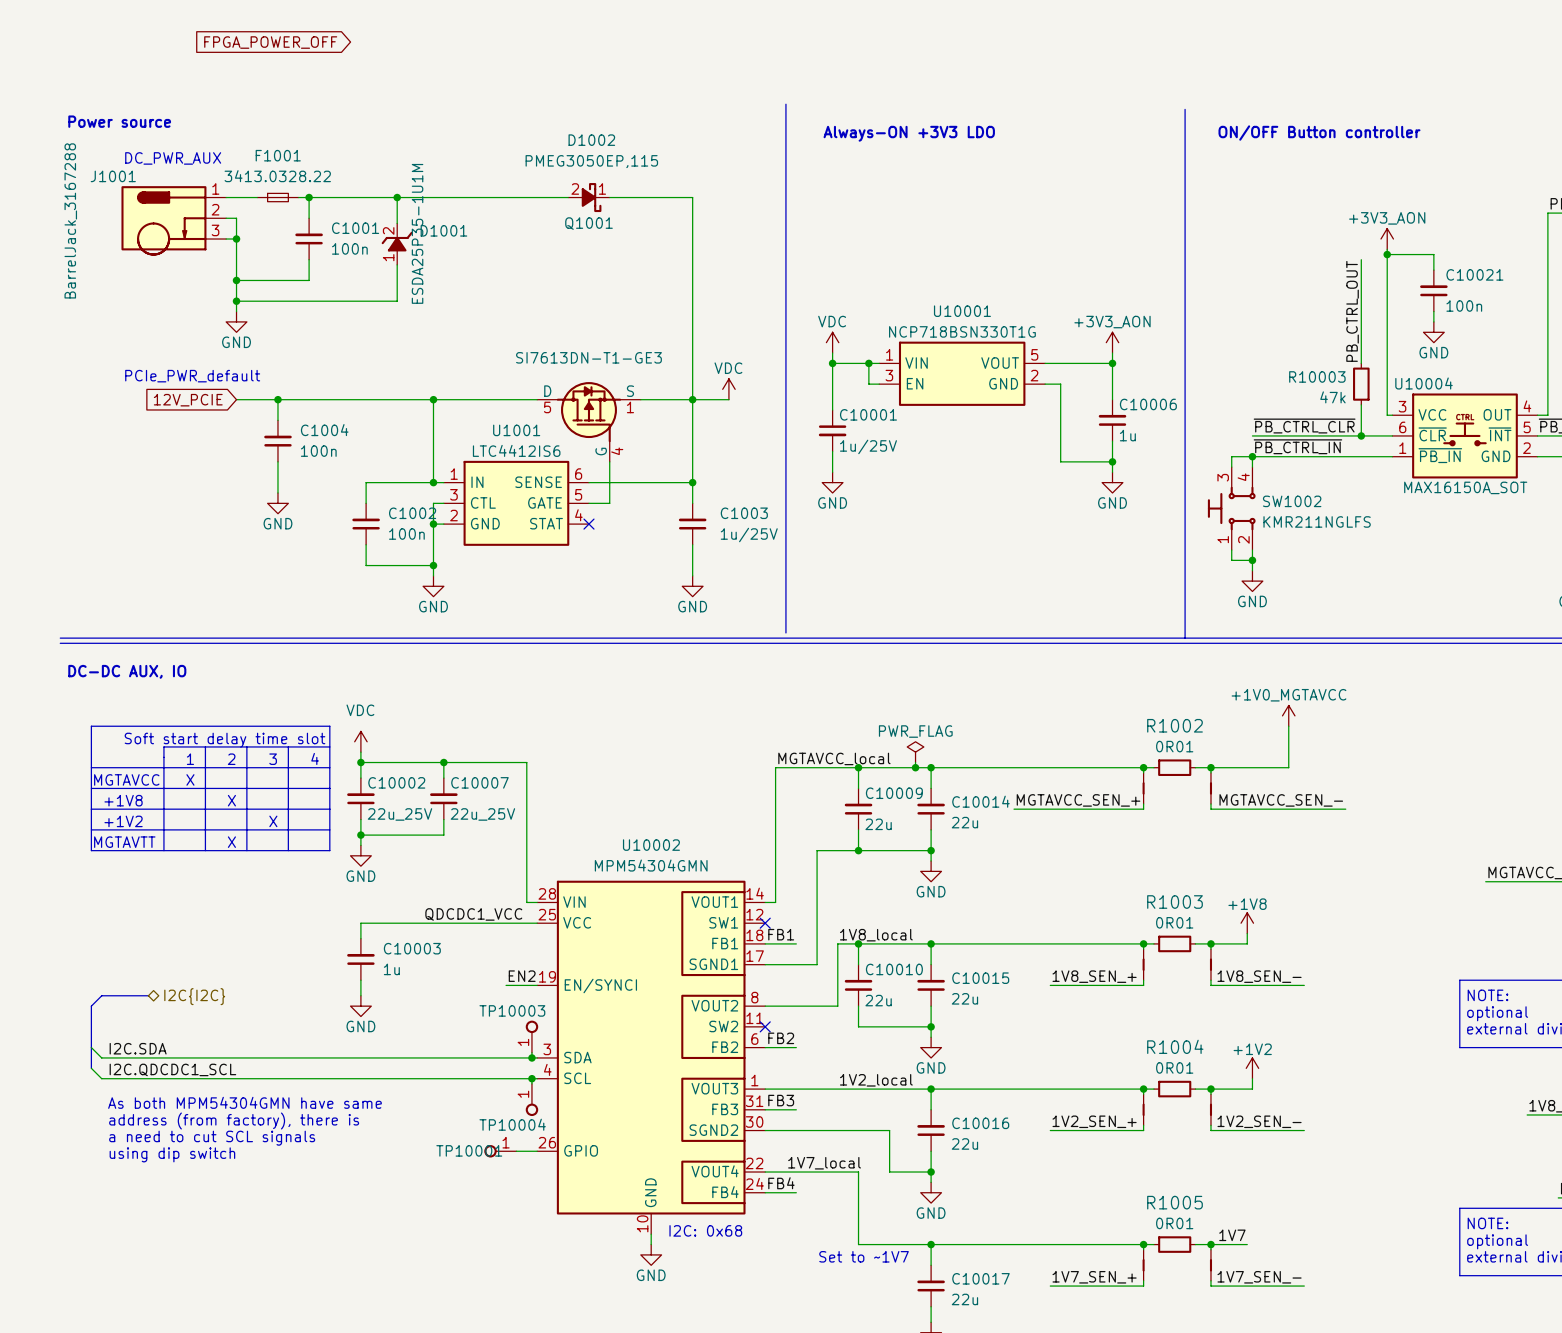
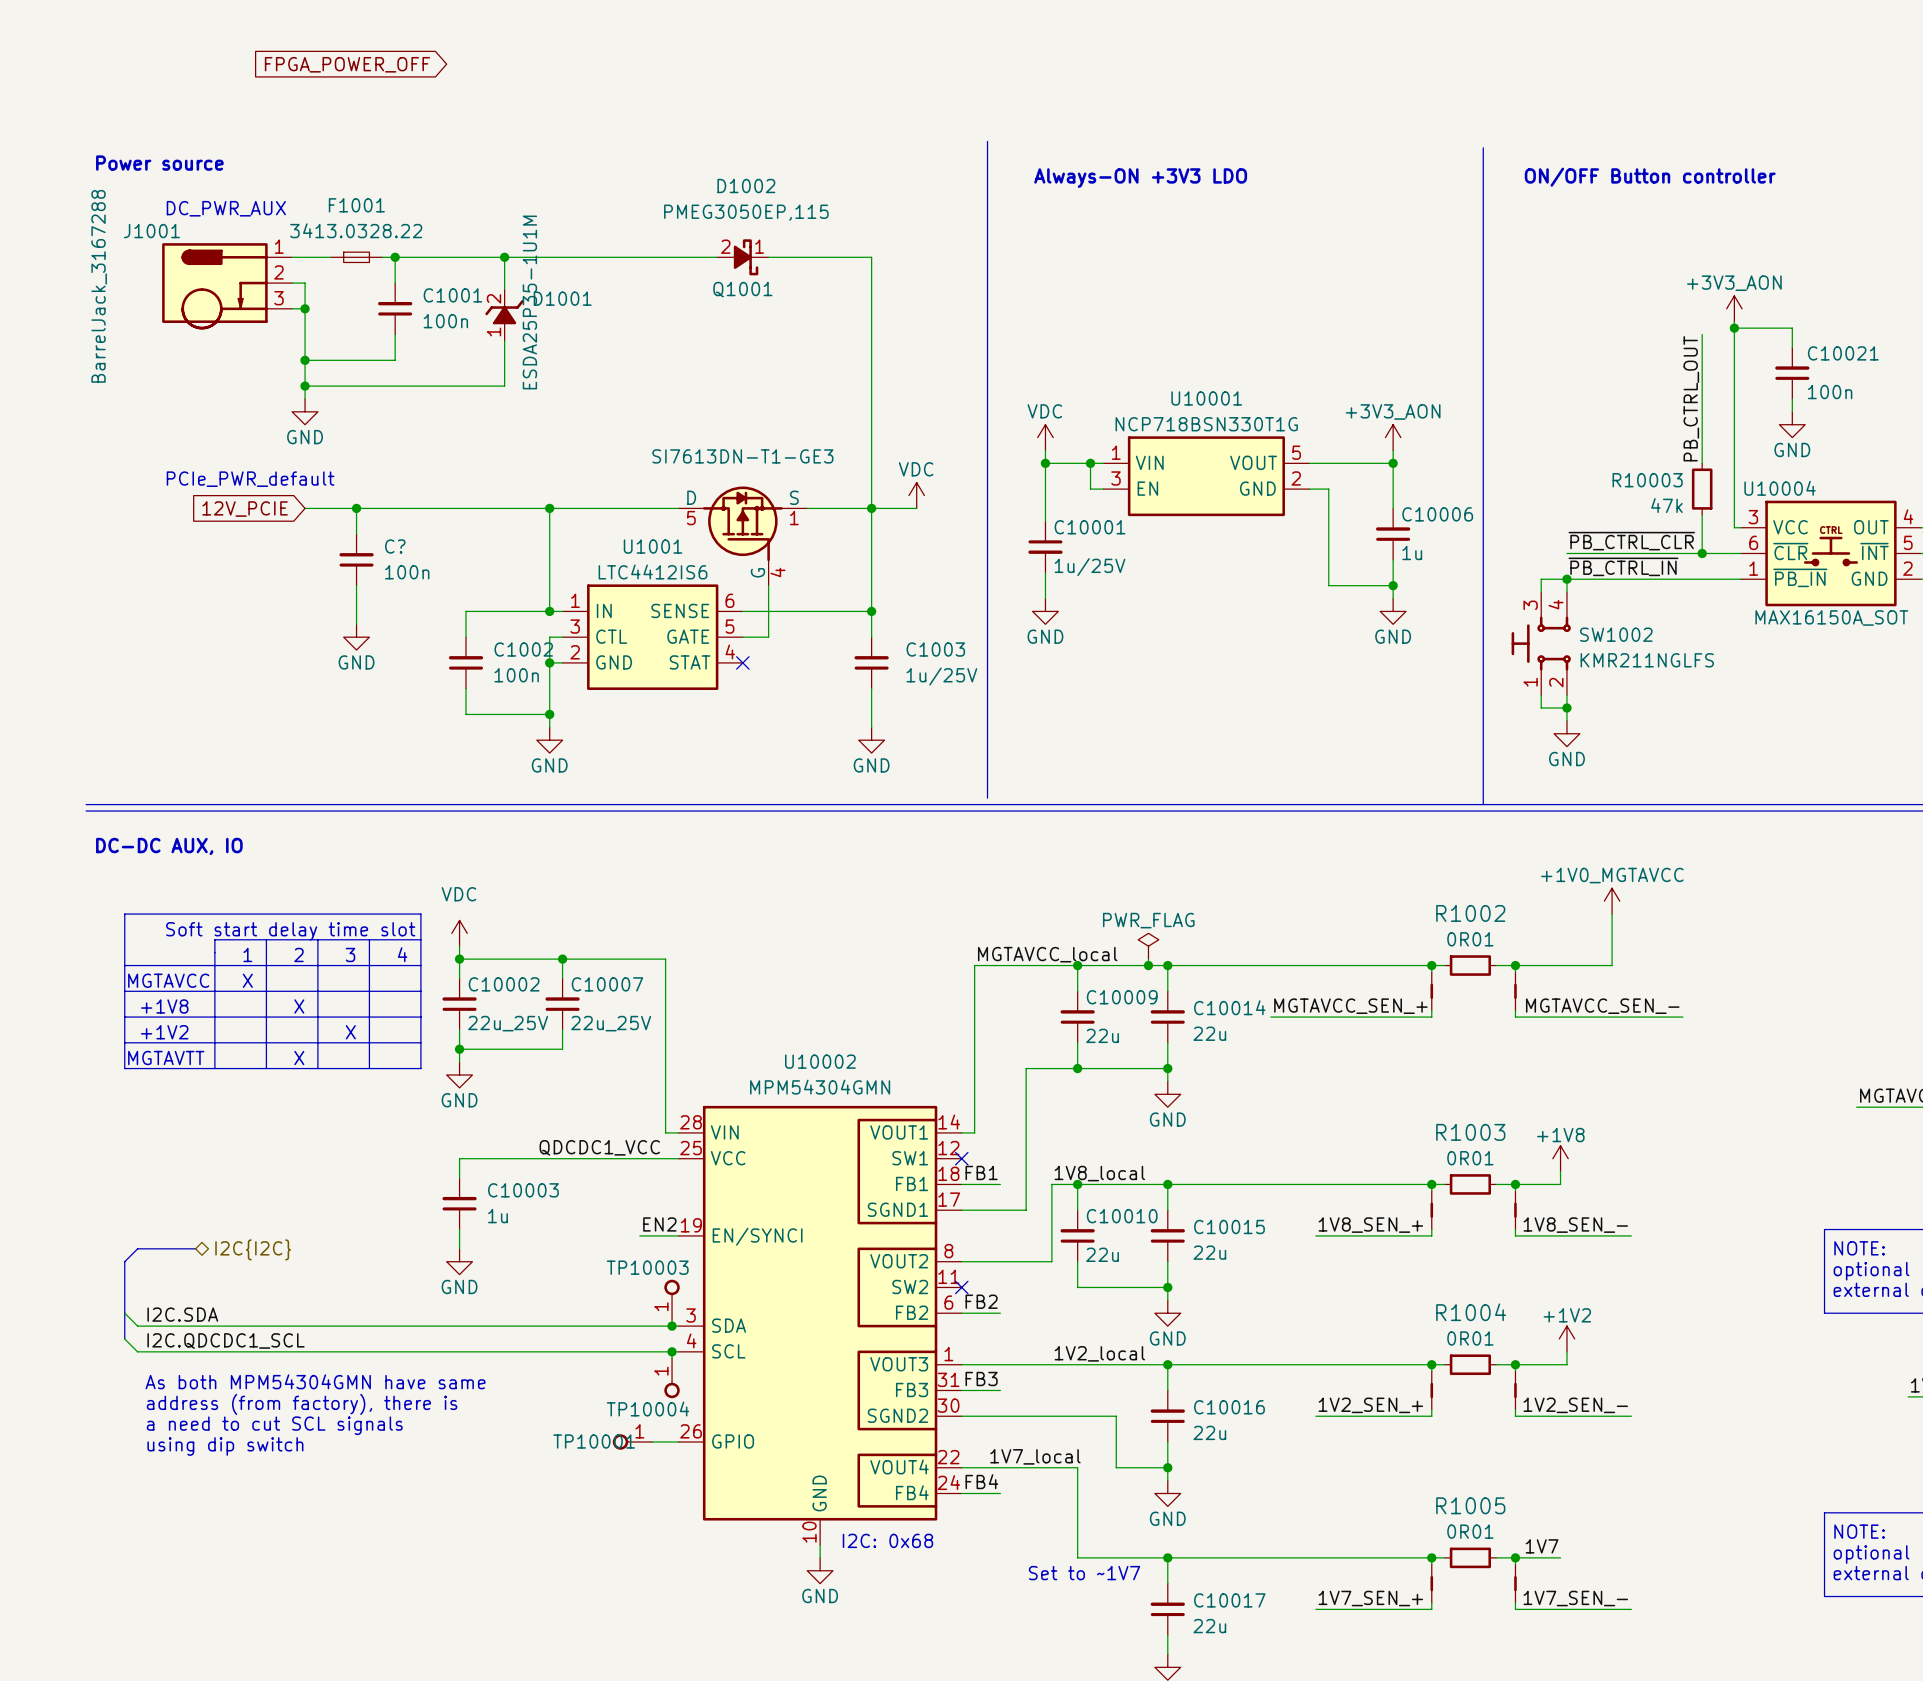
C1004 name: C1004 (324, 430) -> C? (395, 546)

